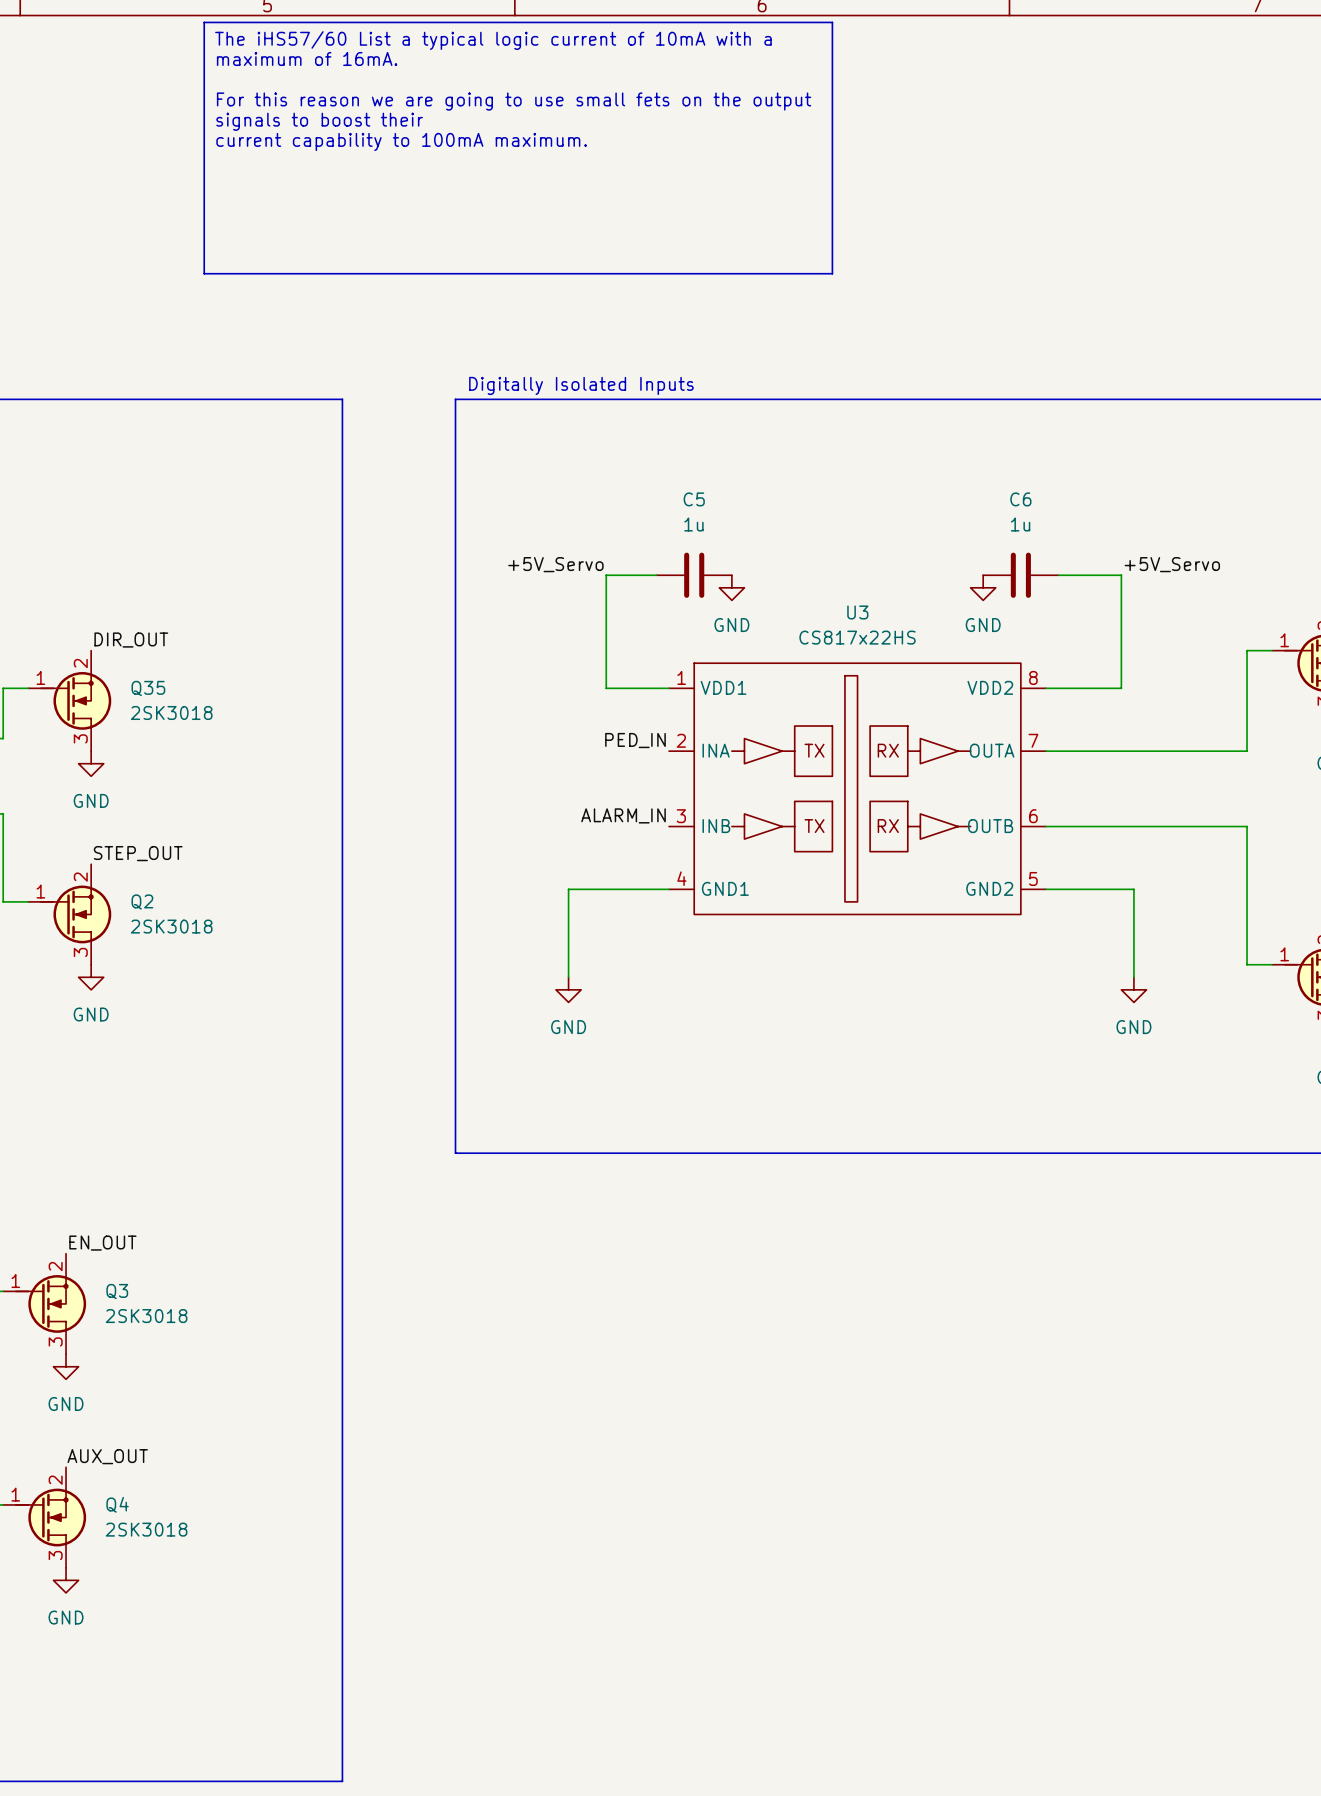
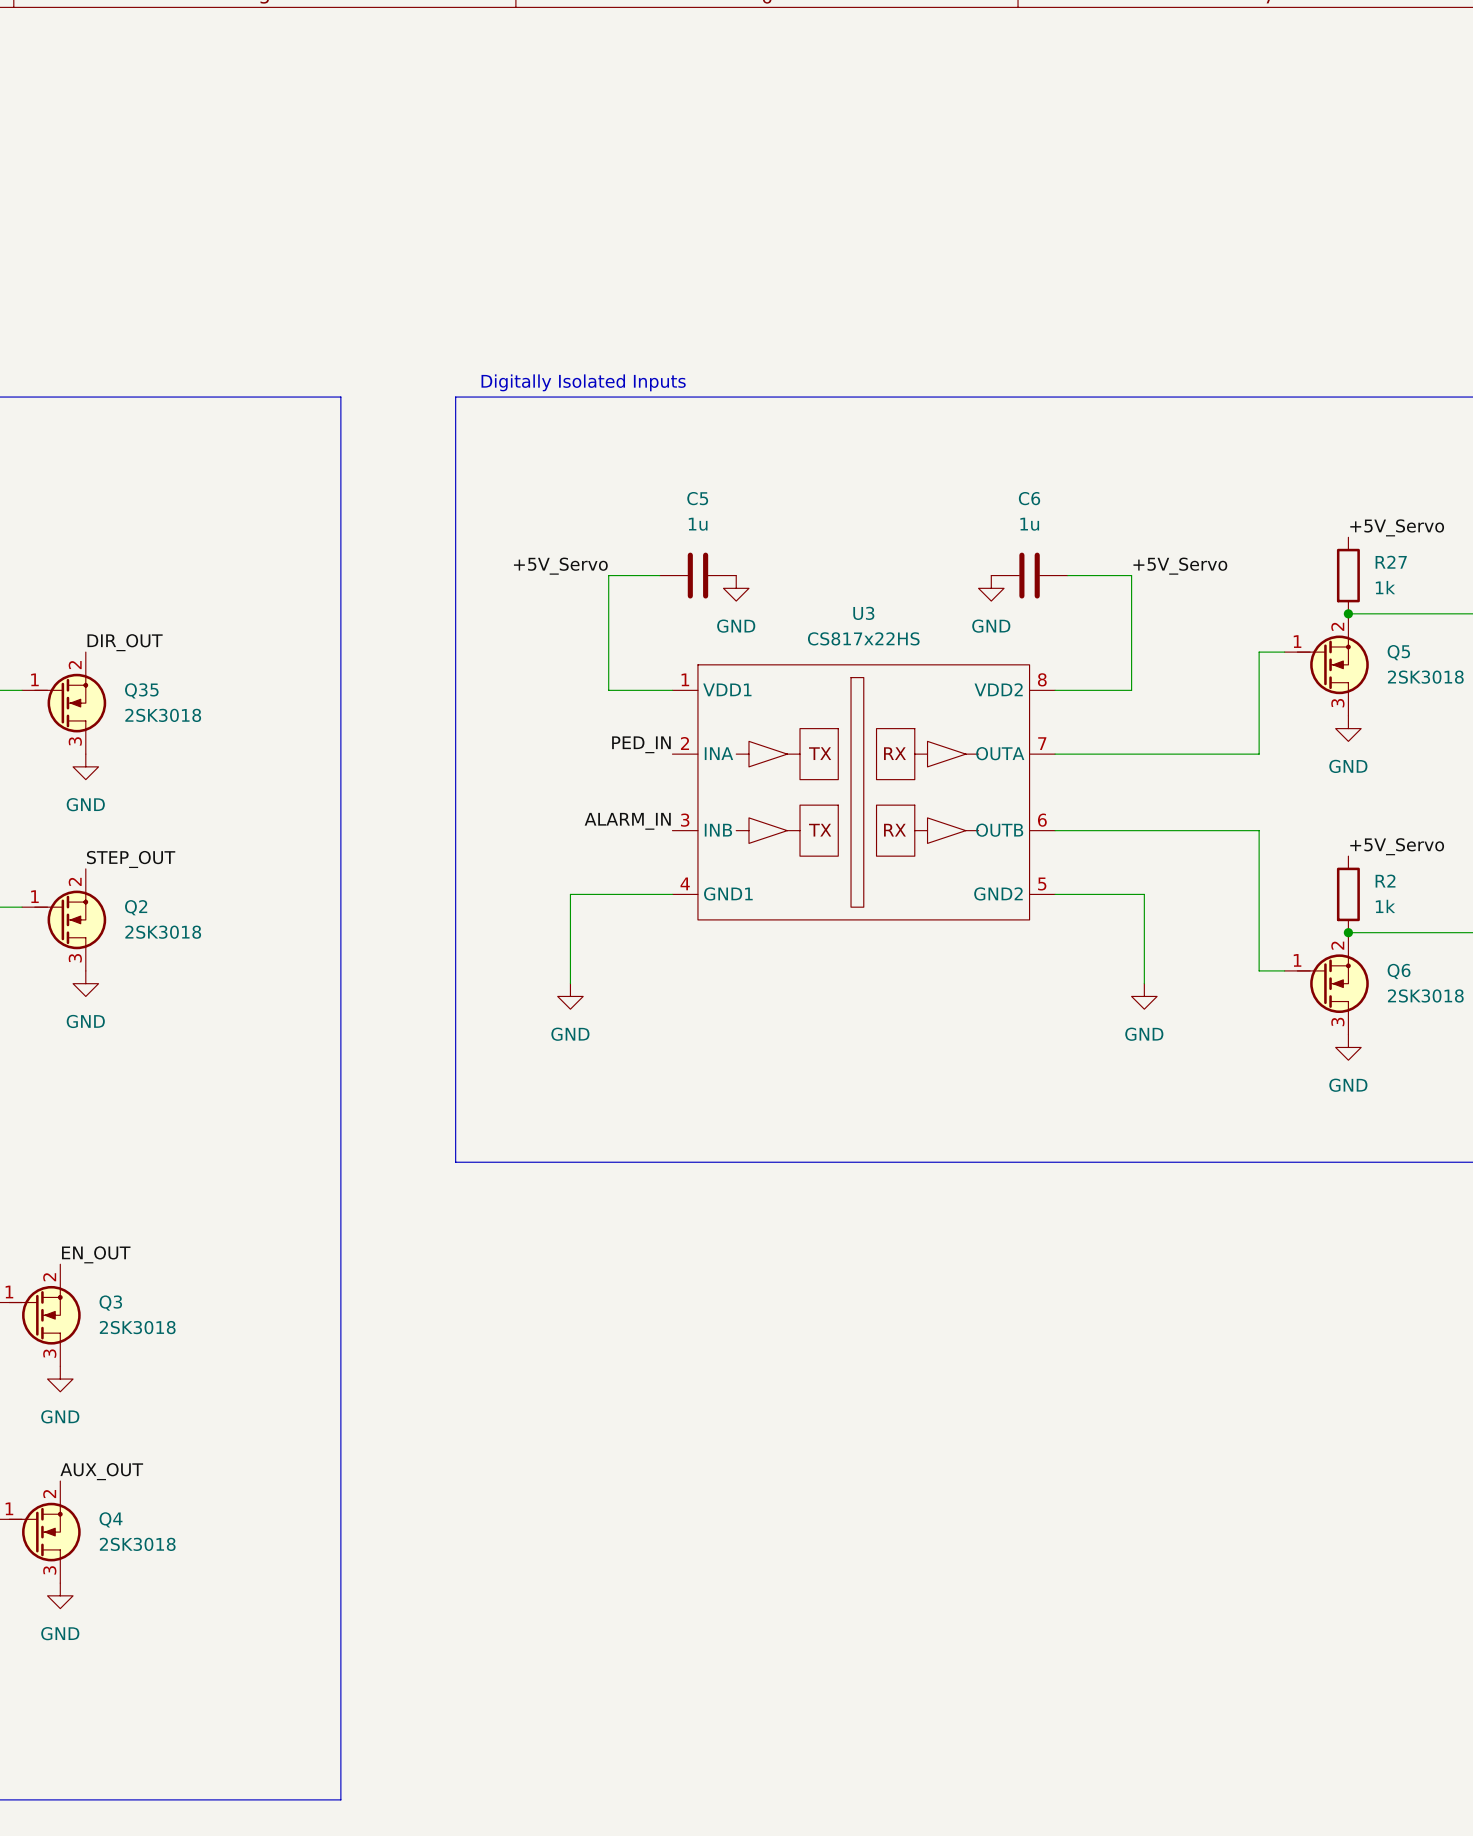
line: (204, 22) (832, 22) (832, 273) (204, 273) (204, 22) -> none
text: The iHS57/60 List a typical logic current of 10mA with a (493, 40) -> none
text: maximum of 16mA. (307, 58) -> none
text: For this reason we are going to use small fets on the output (514, 101) -> none
text: signals to boost their (319, 121) -> none
text: current capability to 100mA maximum. (401, 141) -> none

